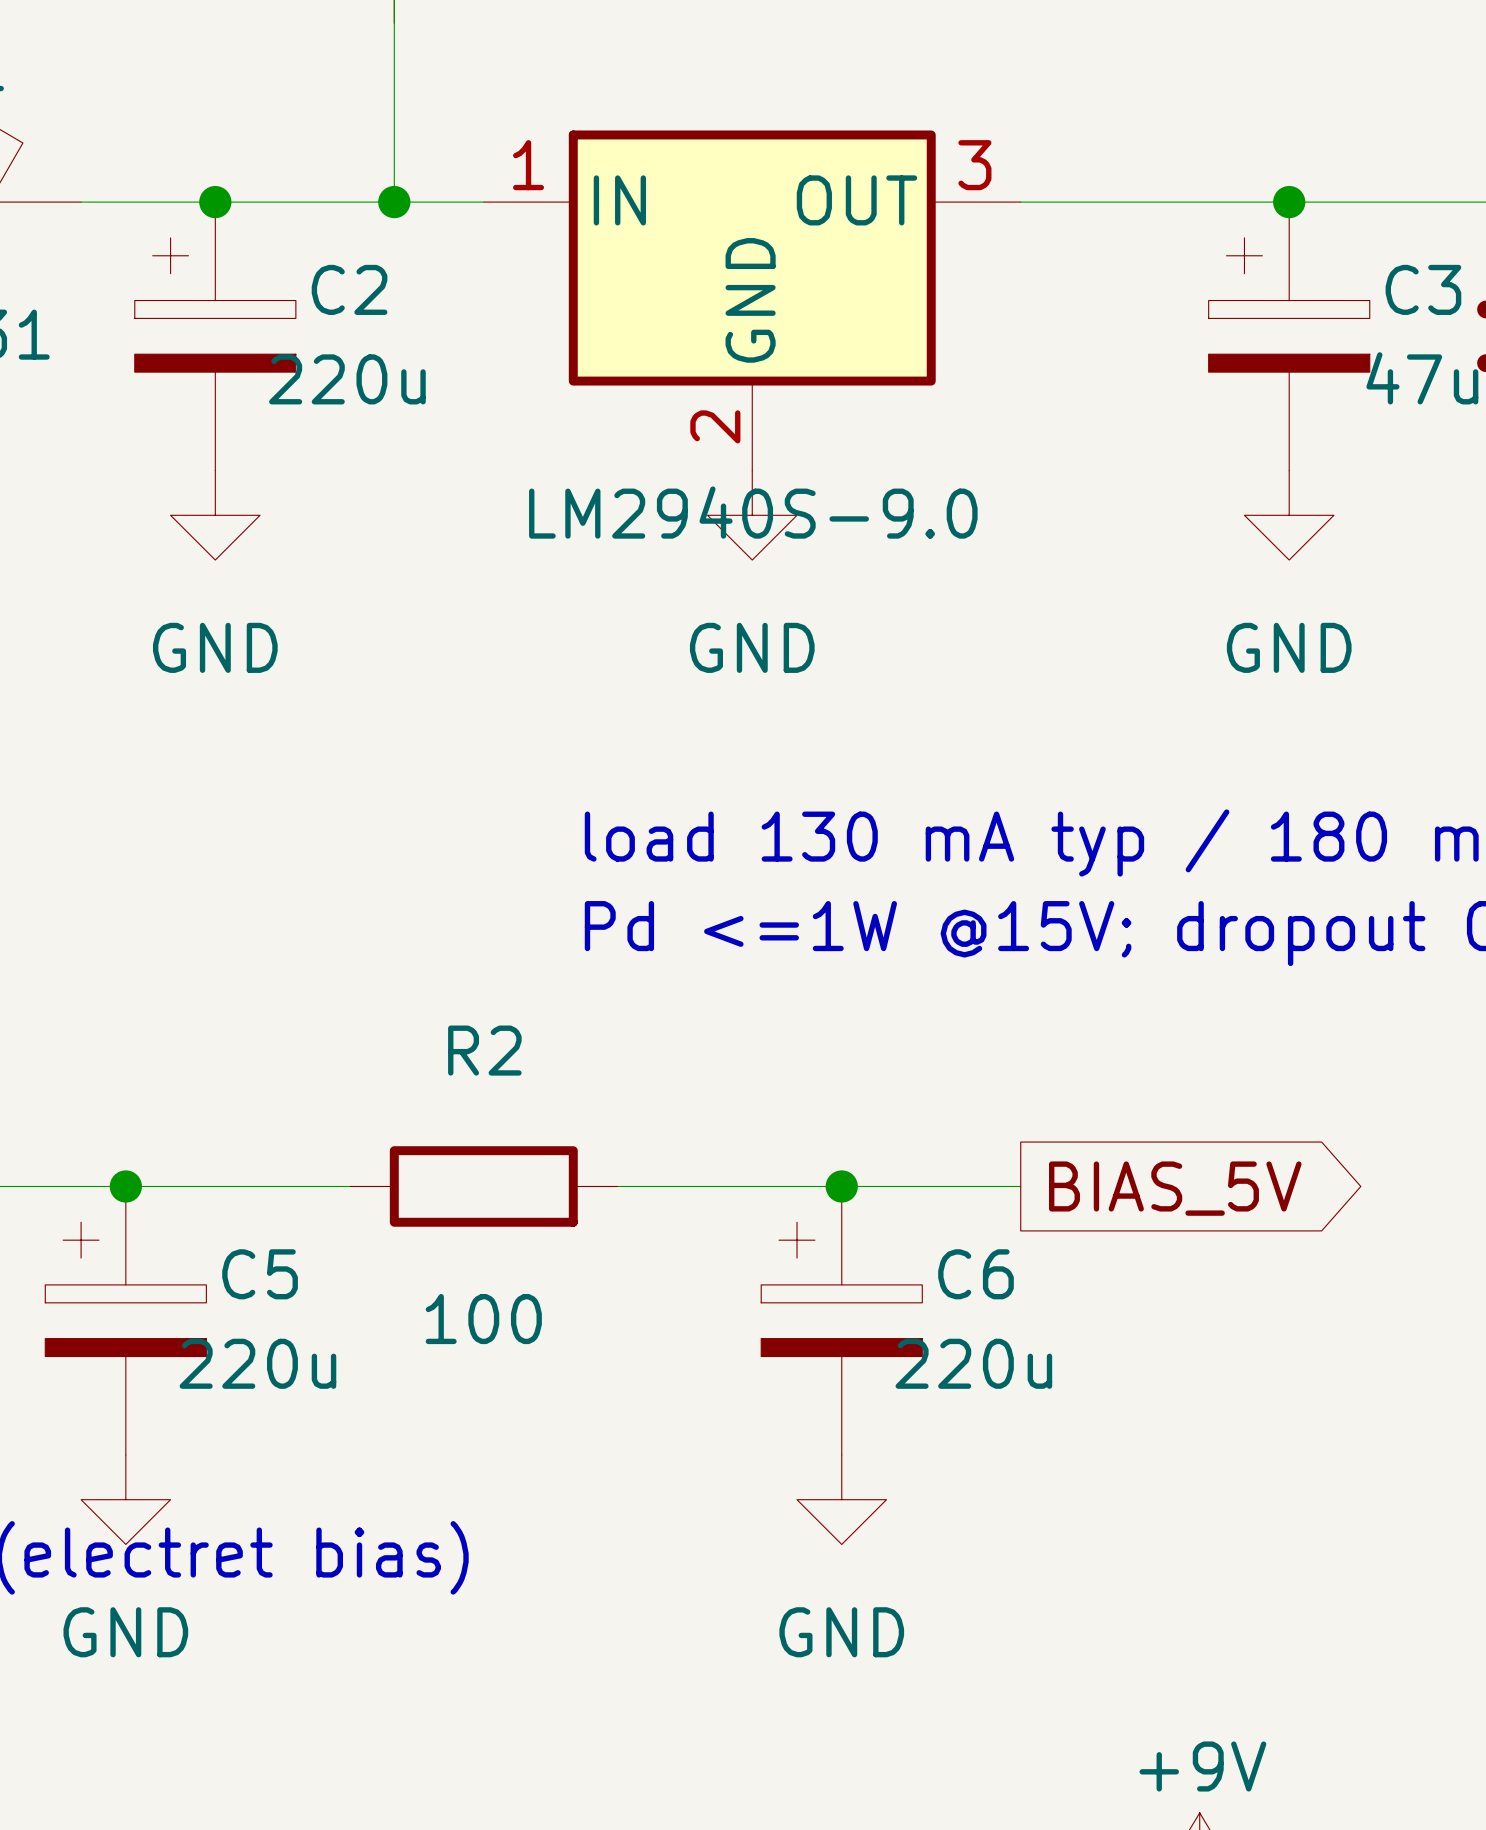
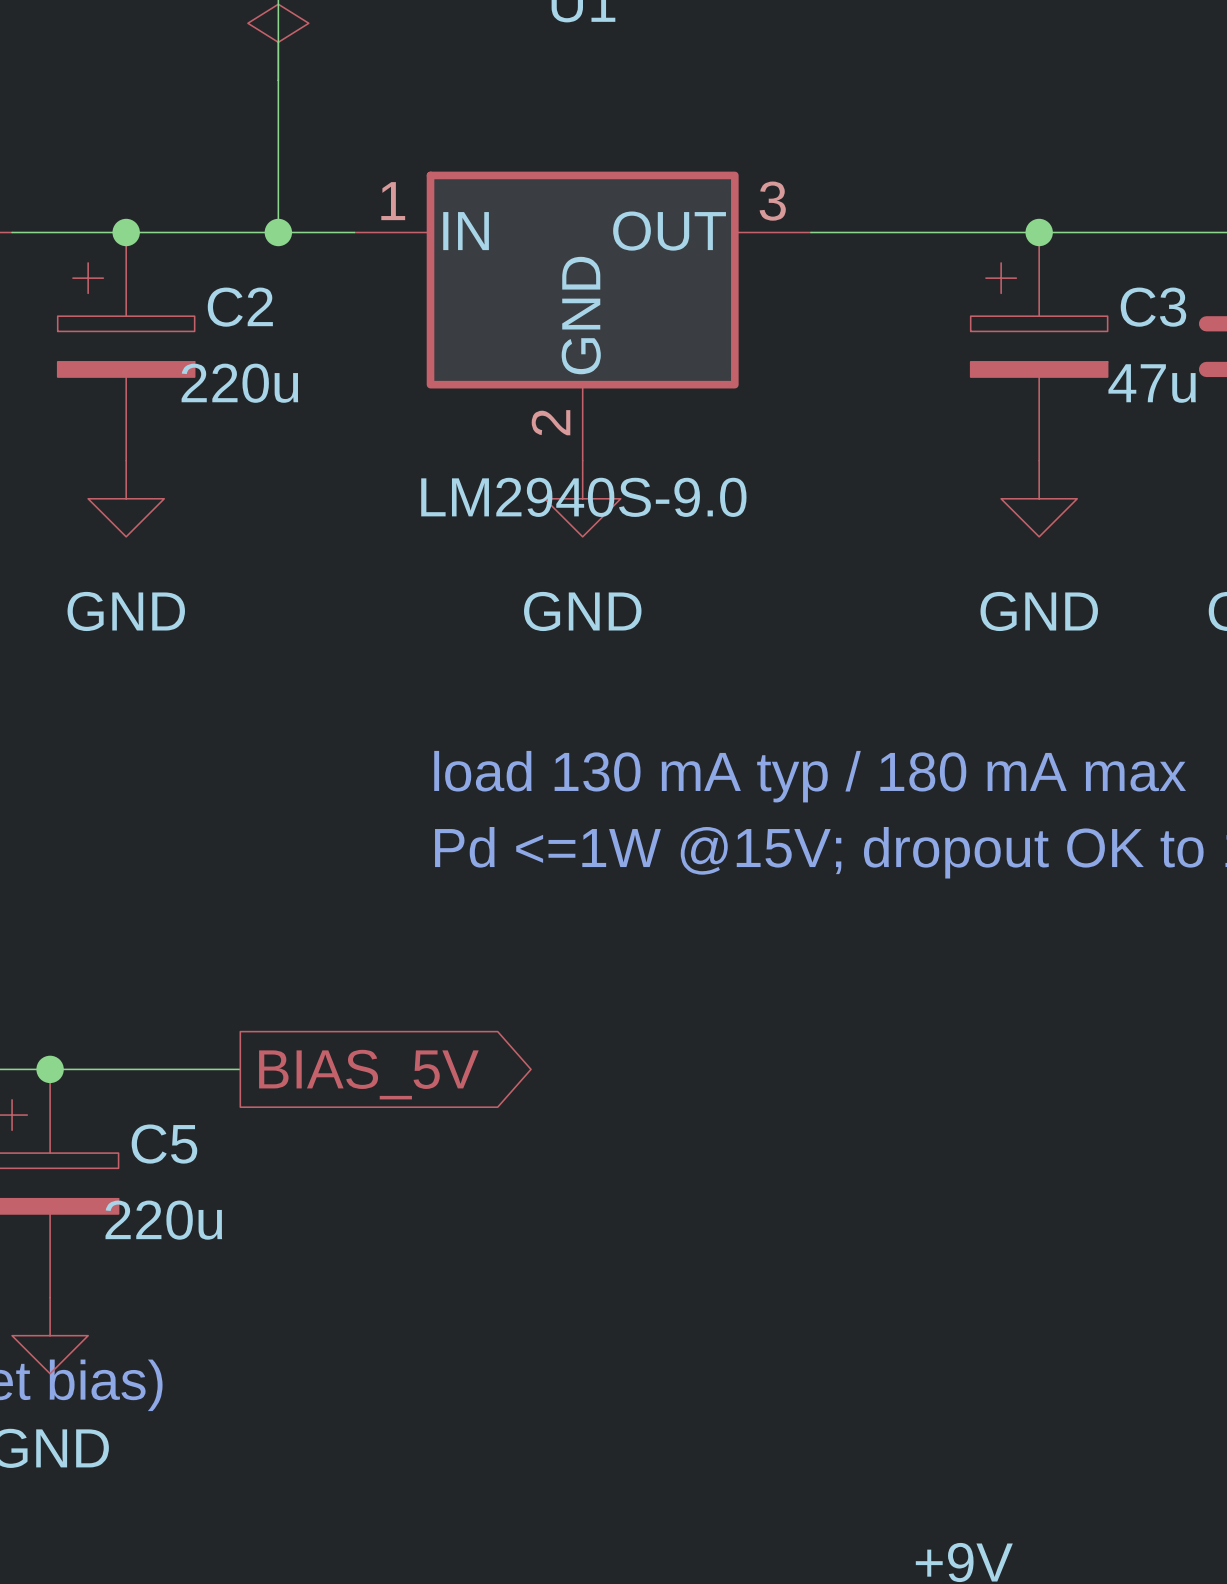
R2: 100 (483, 1186) -> none
wire: (618, 1186) (1020, 1186) -> none
junction: (841, 1186) -> none
global label position: BIAS_5V (1175, 1188) -> BIAS_5V (368, 1074)
C6: 220u (841, 1320) -> none
power symbol: GND (841, 1499) -> none

